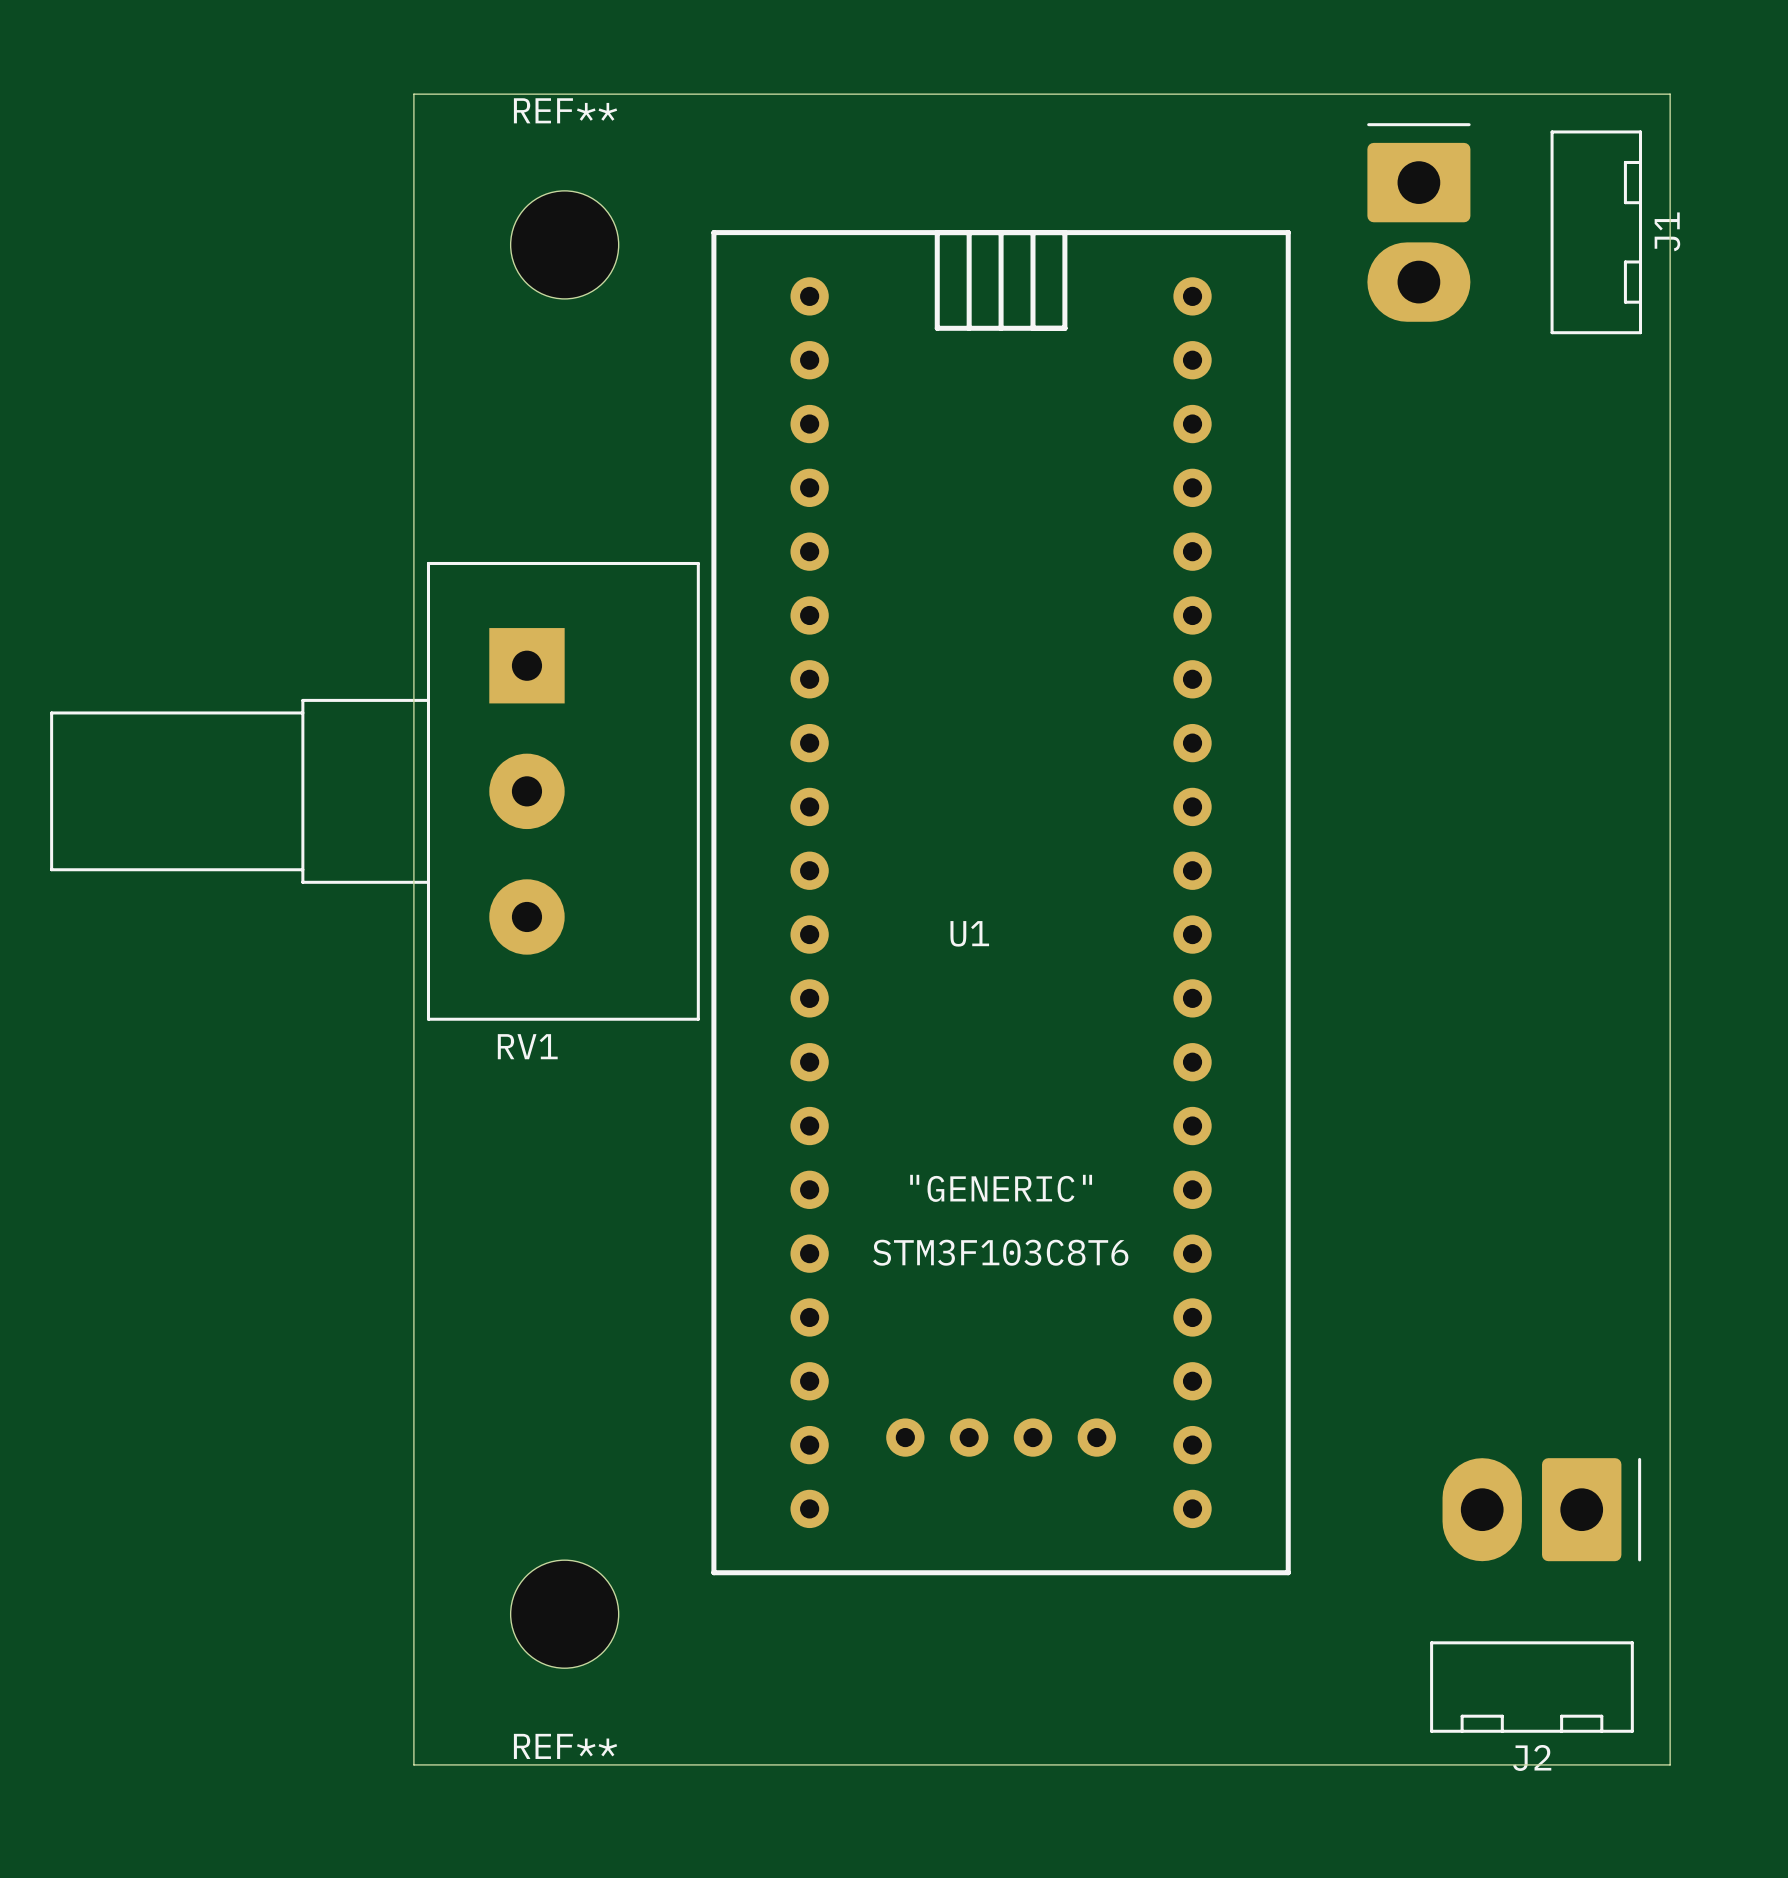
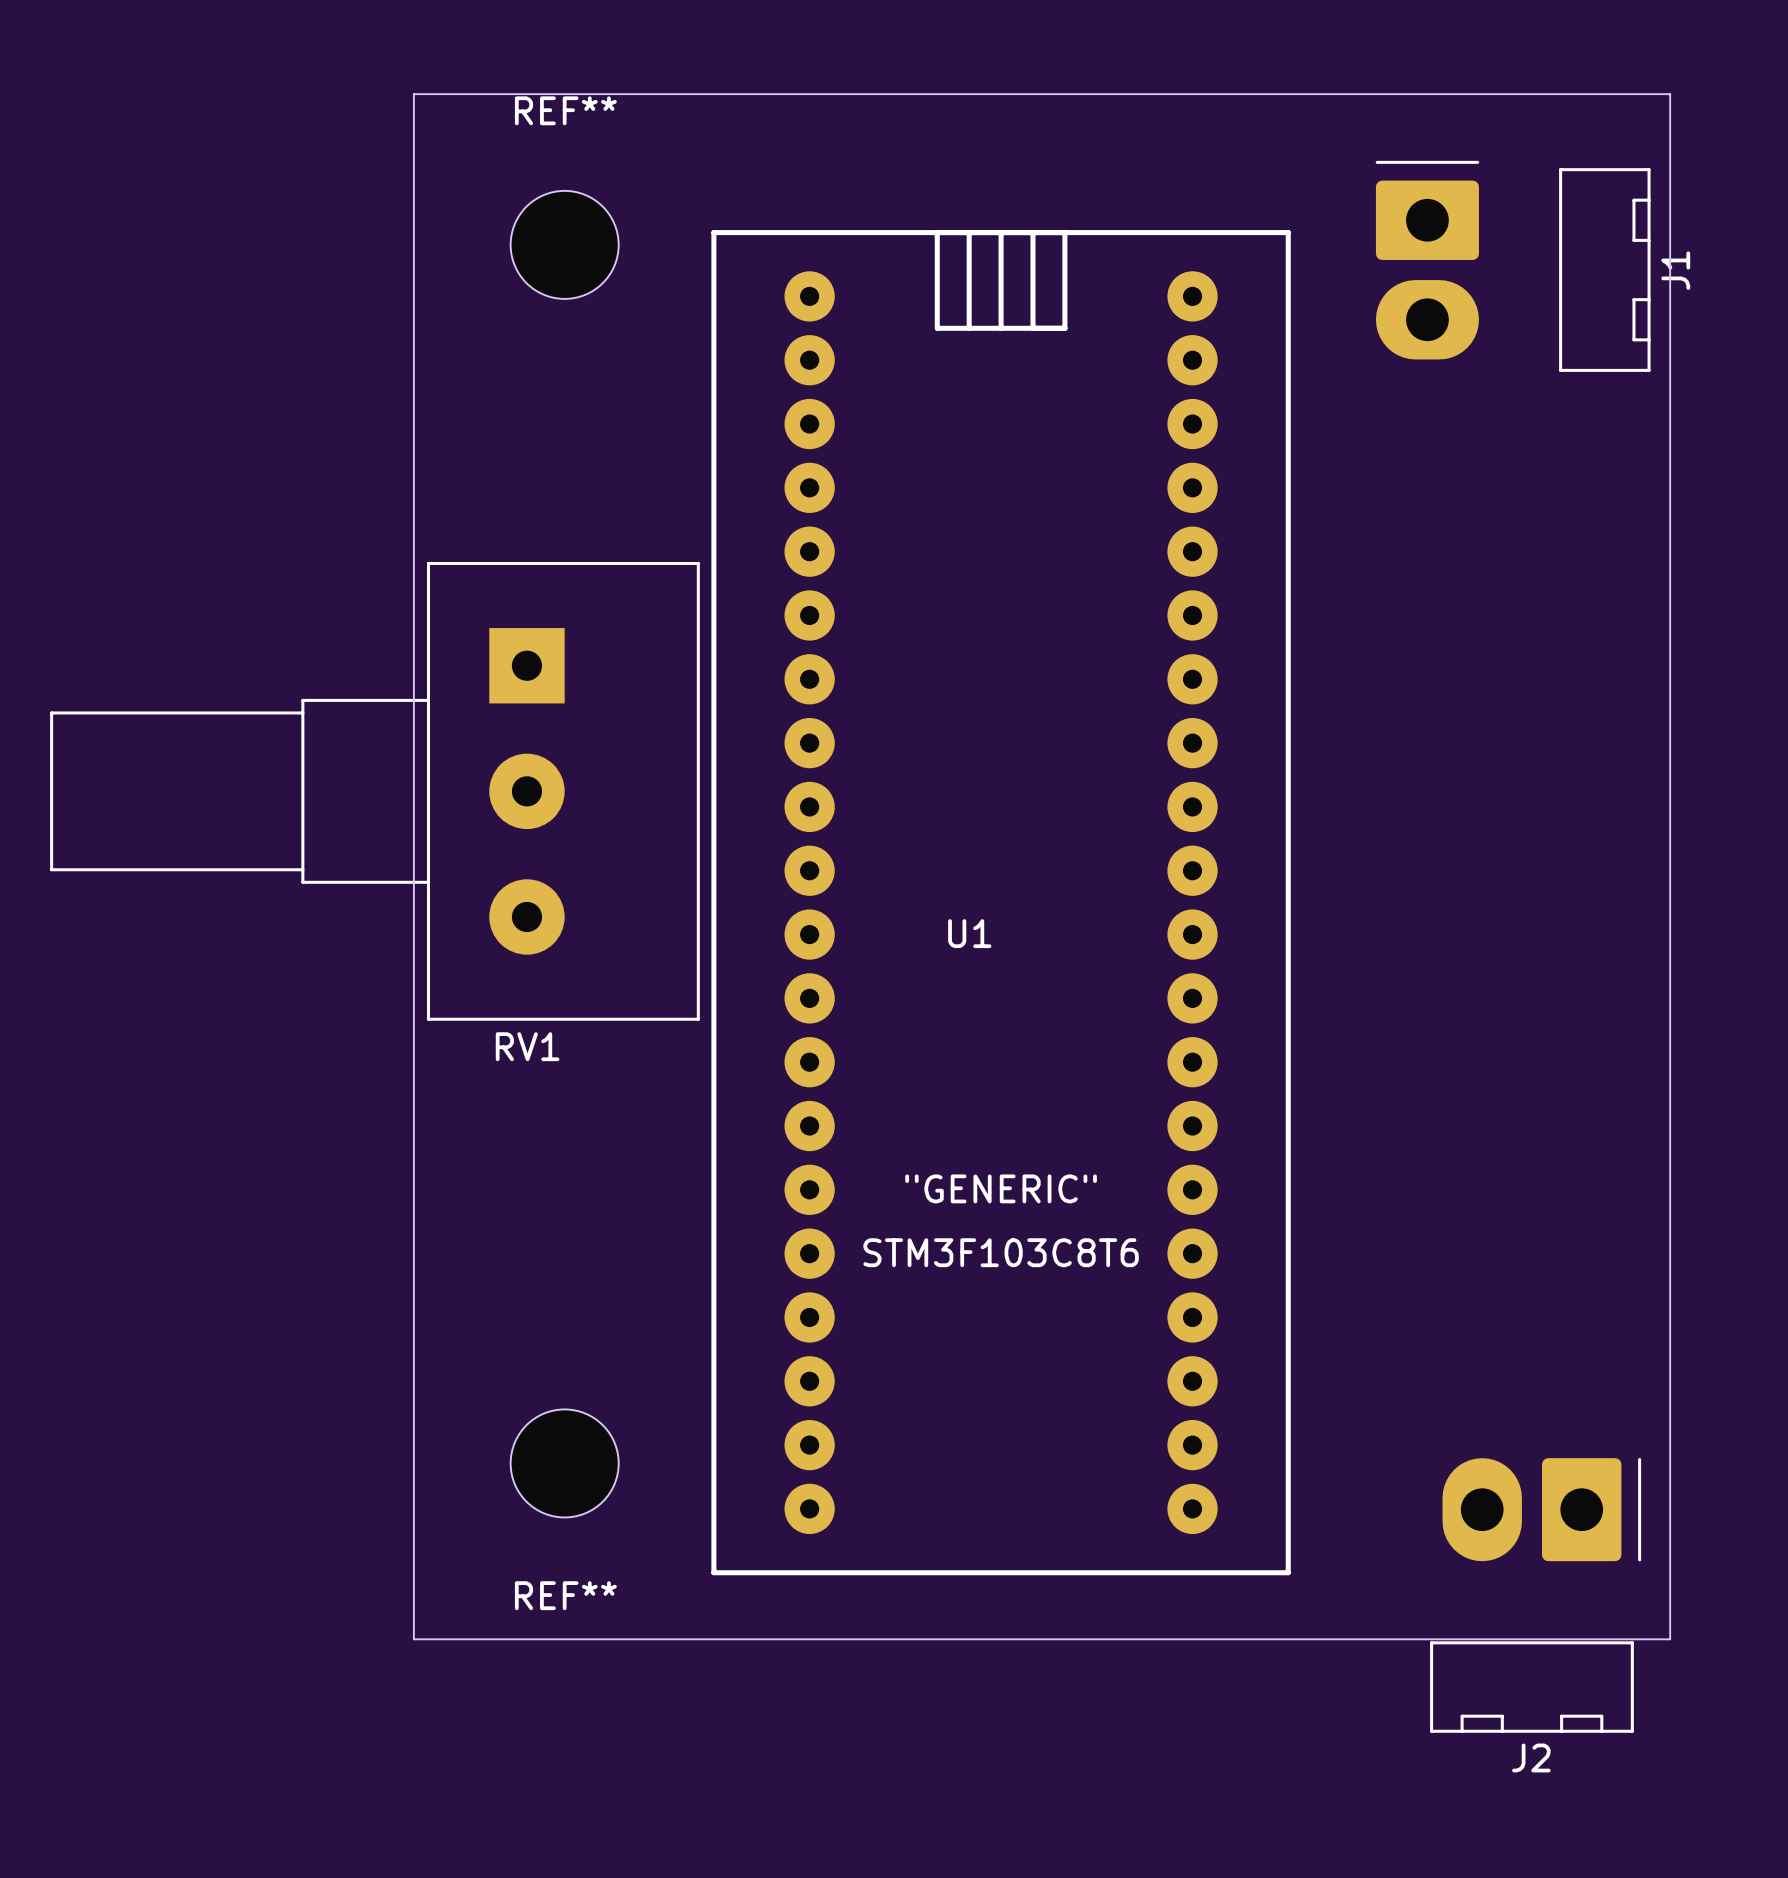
J1 position: (1504, 228) -> (1513, 266)
U1 footprint: [711, 230, 1291, 1576] -> [711, 230, 1291, 1576]
REF** position: (564, 1614) -> (564, 1463)
board edge: (413, 1639) (413, 1764) (1670, 1764) (1670, 1639) -> (413, 1639) (1670, 1639)

